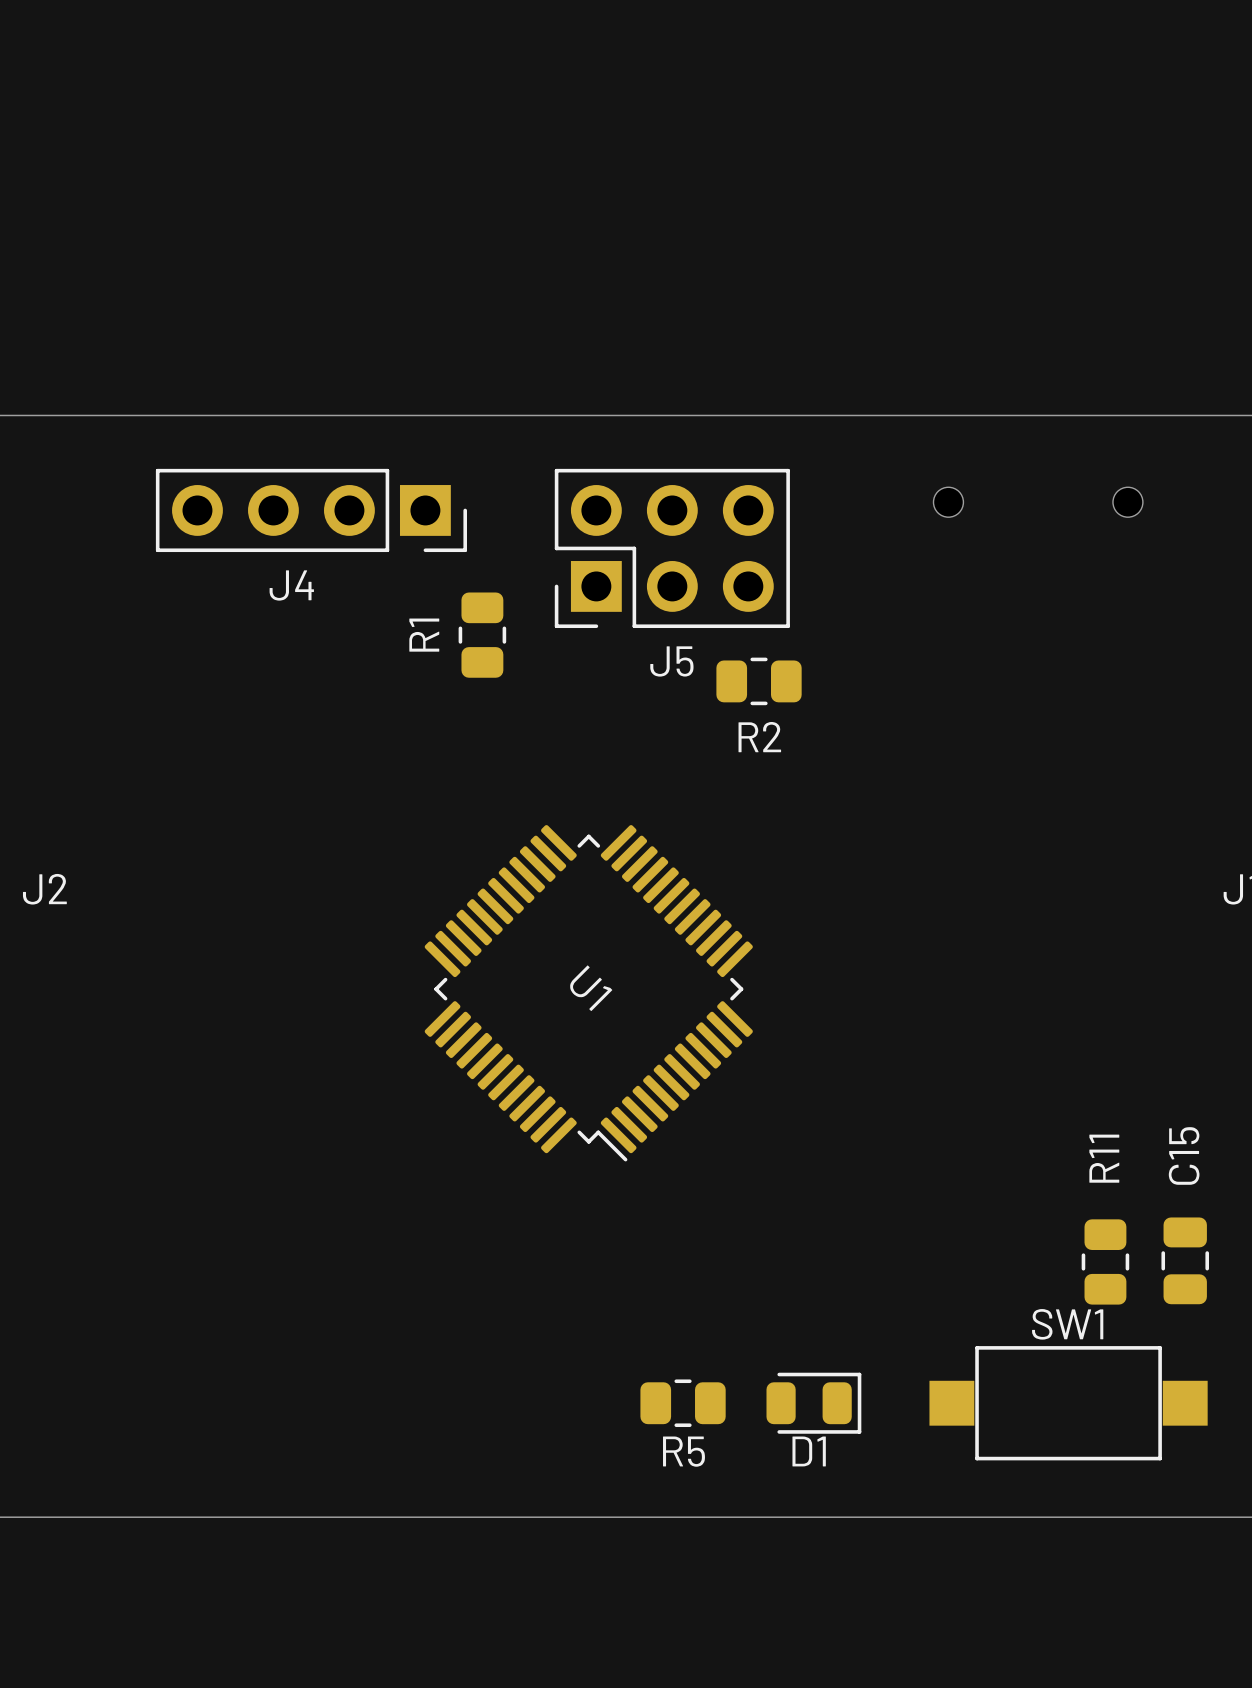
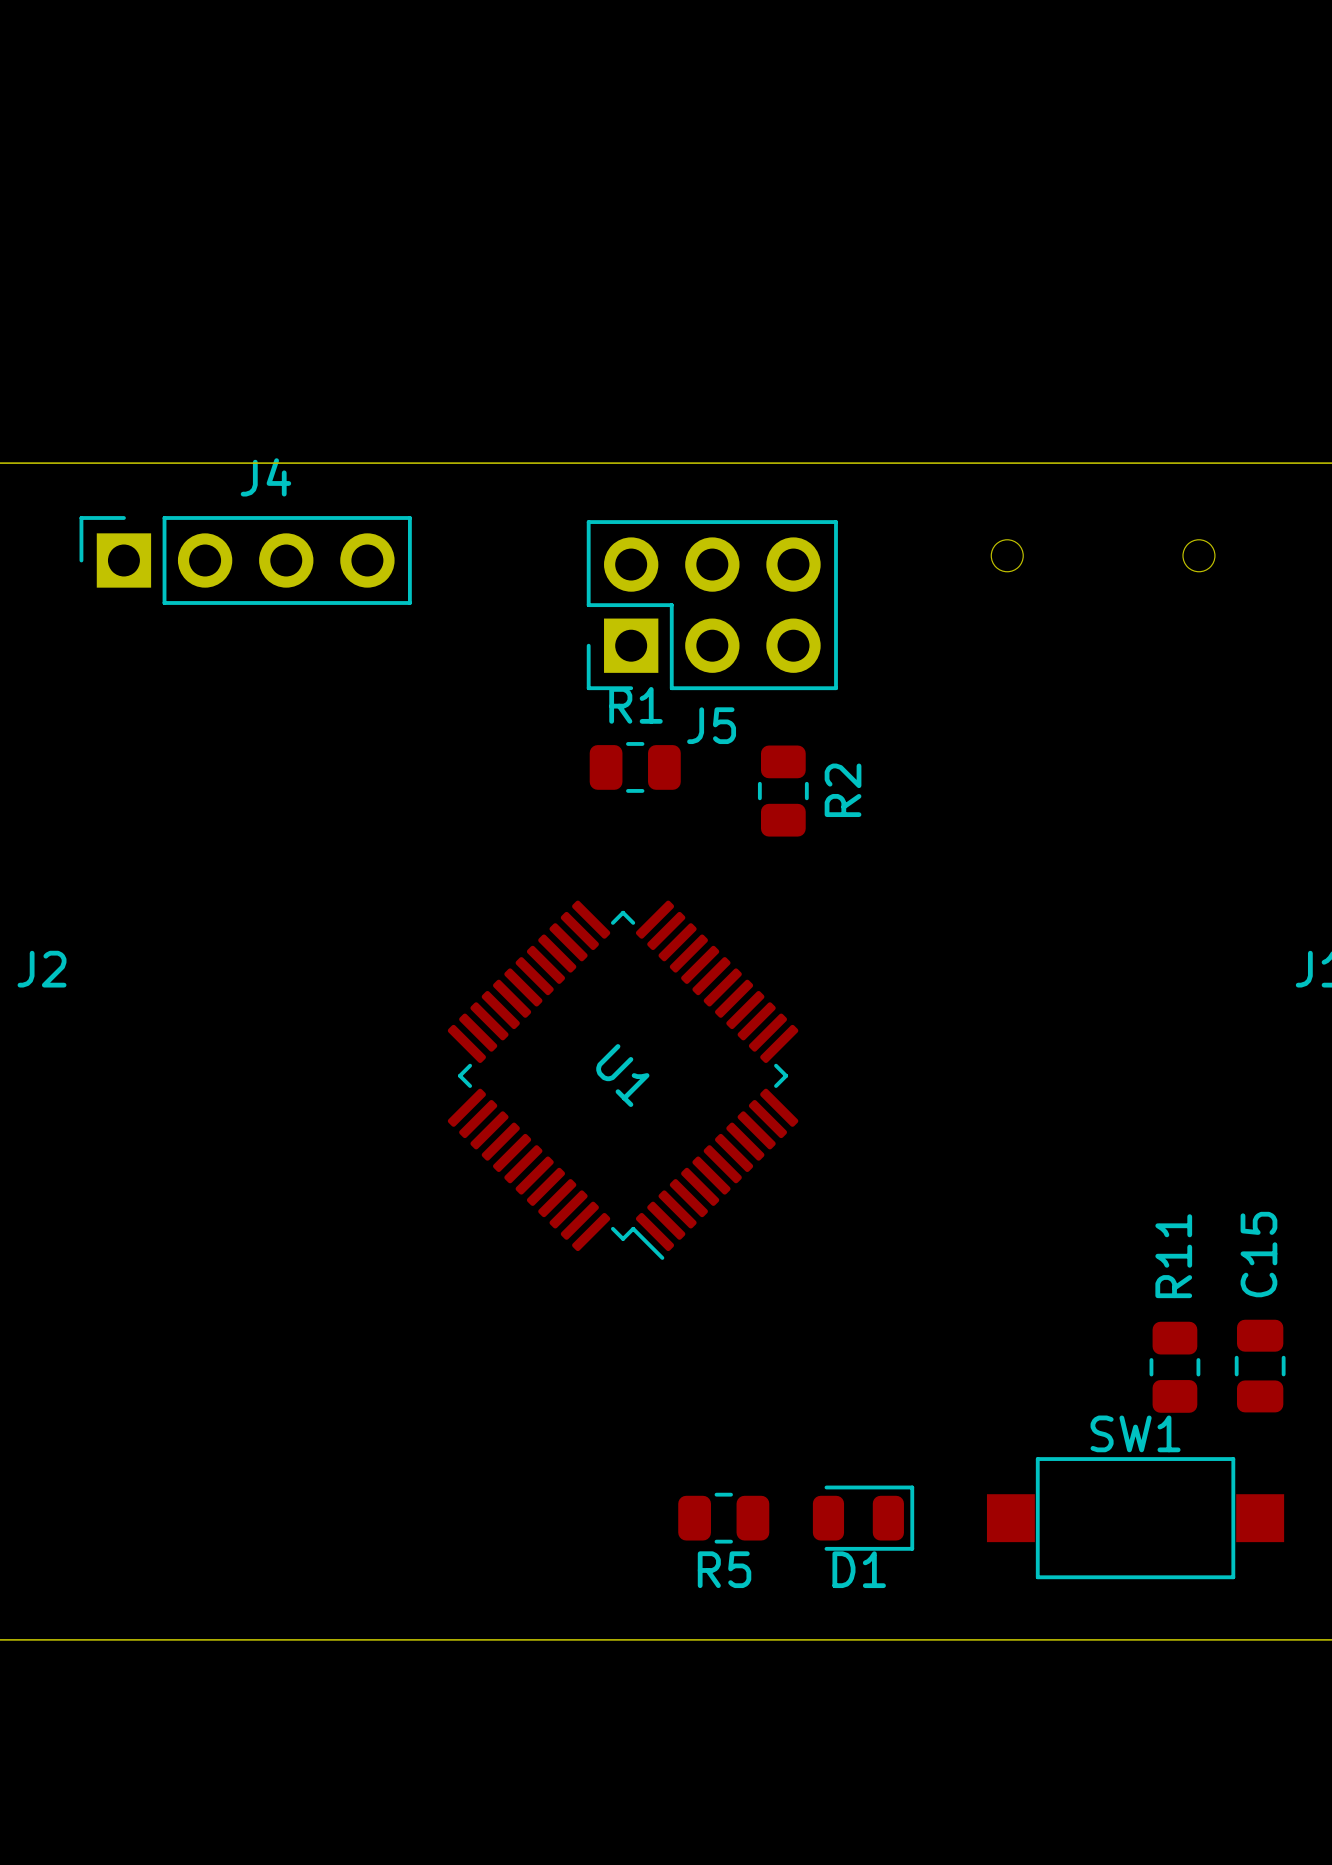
J4 rotation: 0° (311, 510) -> 180° (245, 560)
R1 rotation: 0° (482, 635) -> 90° clockwise (635, 767)
R1 position: (482, 635) -> (635, 767)
R2 rotation: 0° (759, 681) -> 90° clockwise (783, 791)
R2 name position: R2 (759, 737) -> R2 (843, 790)

